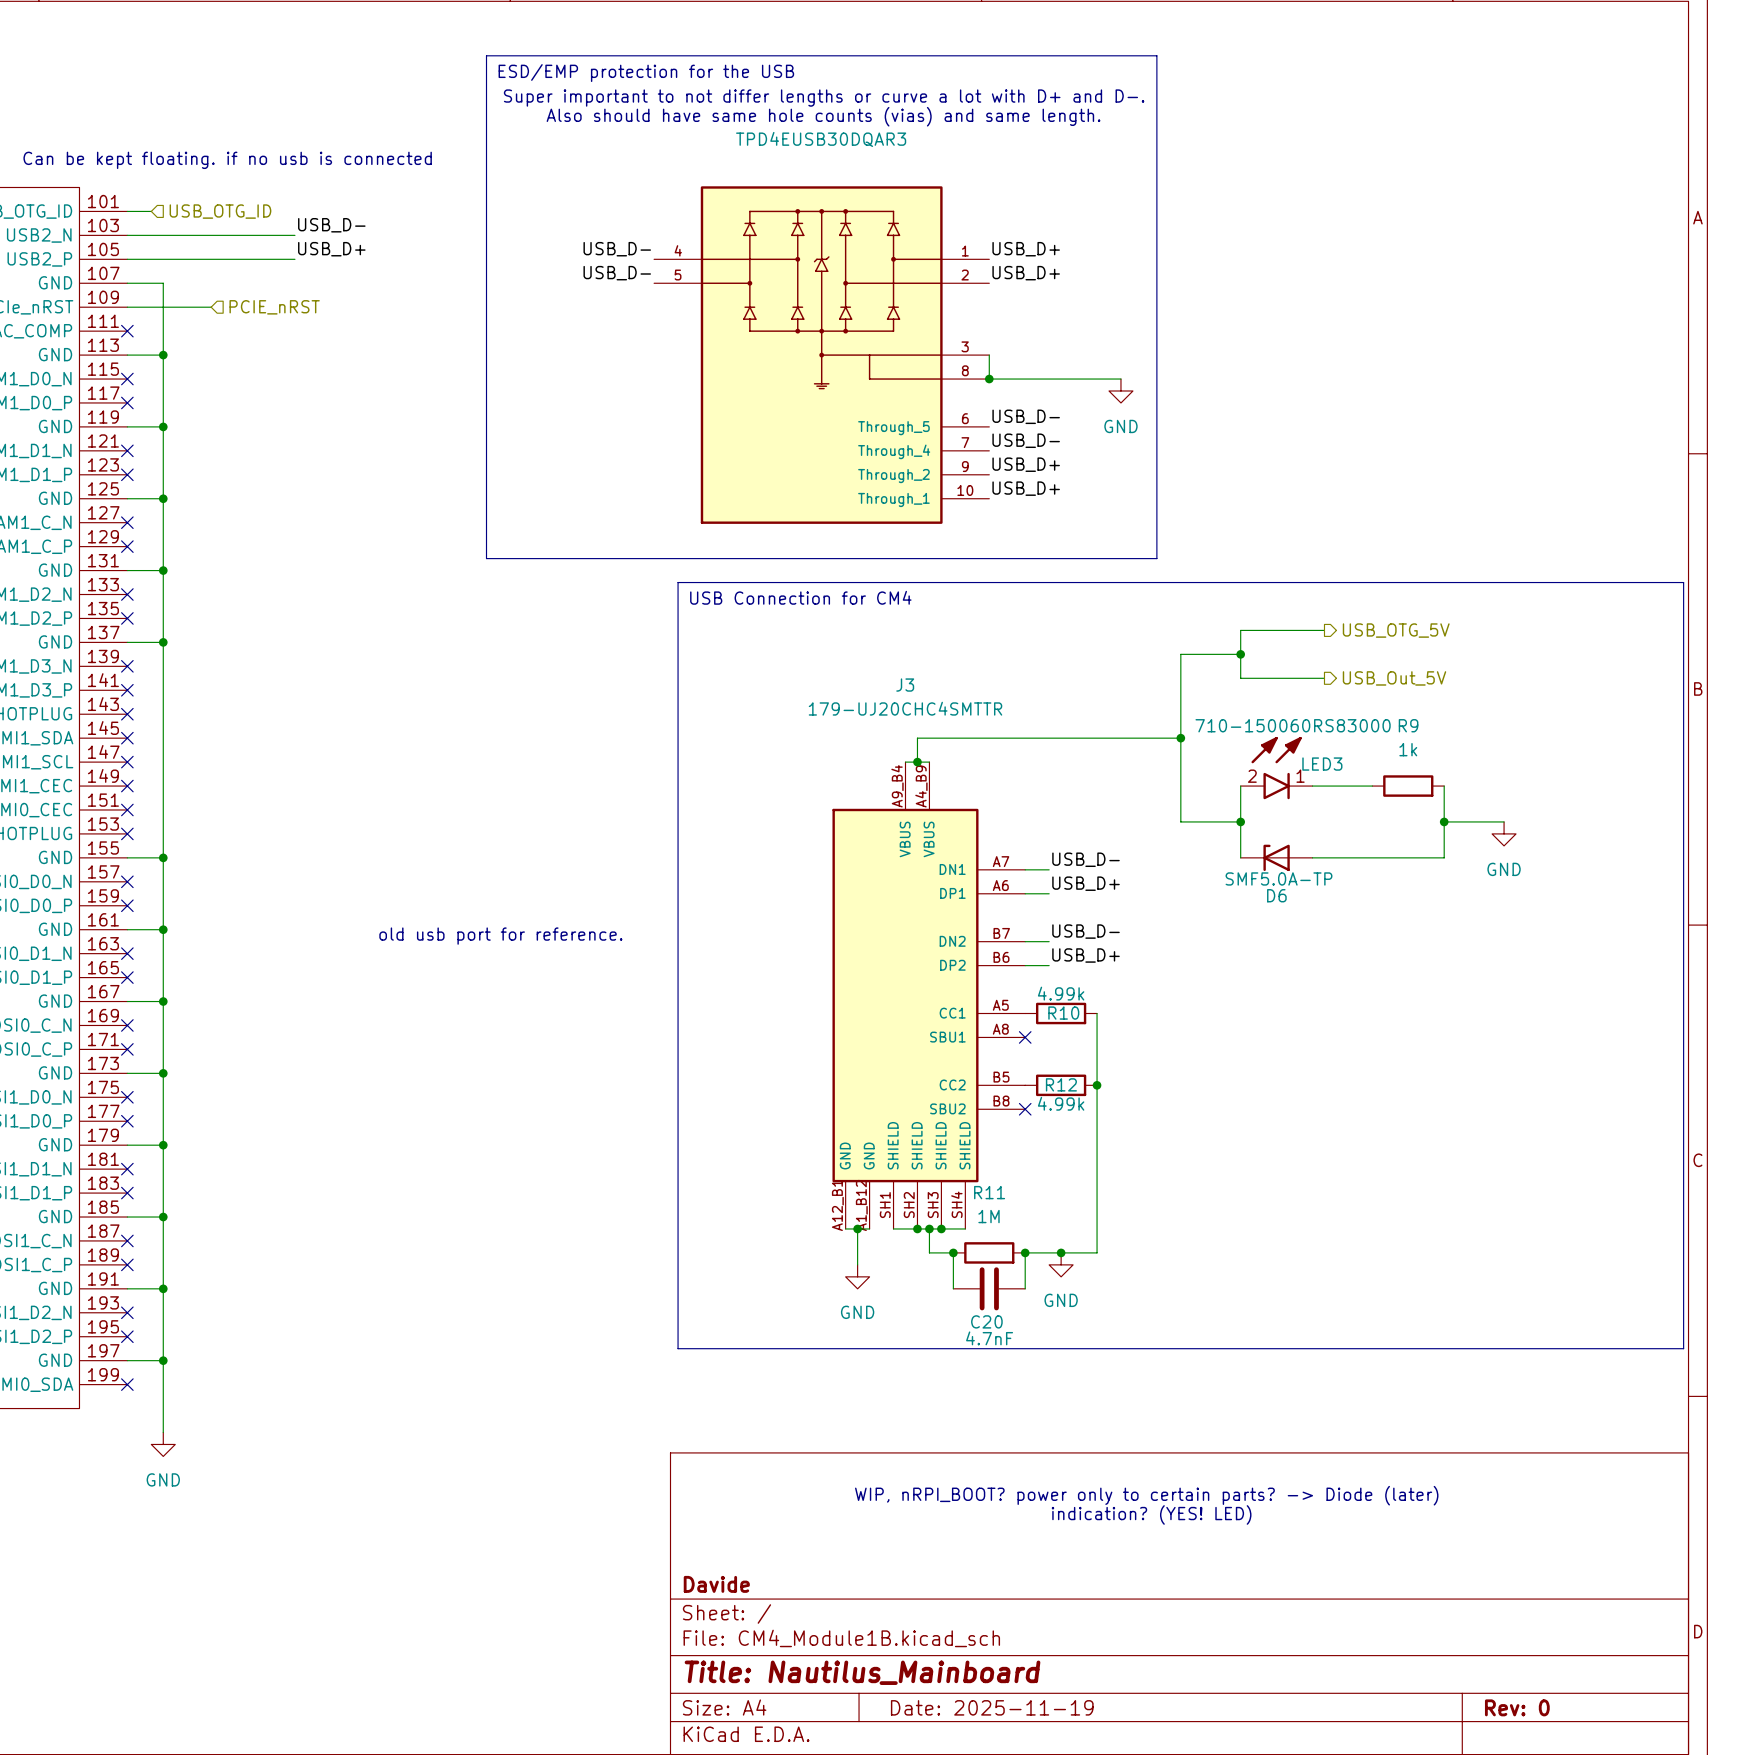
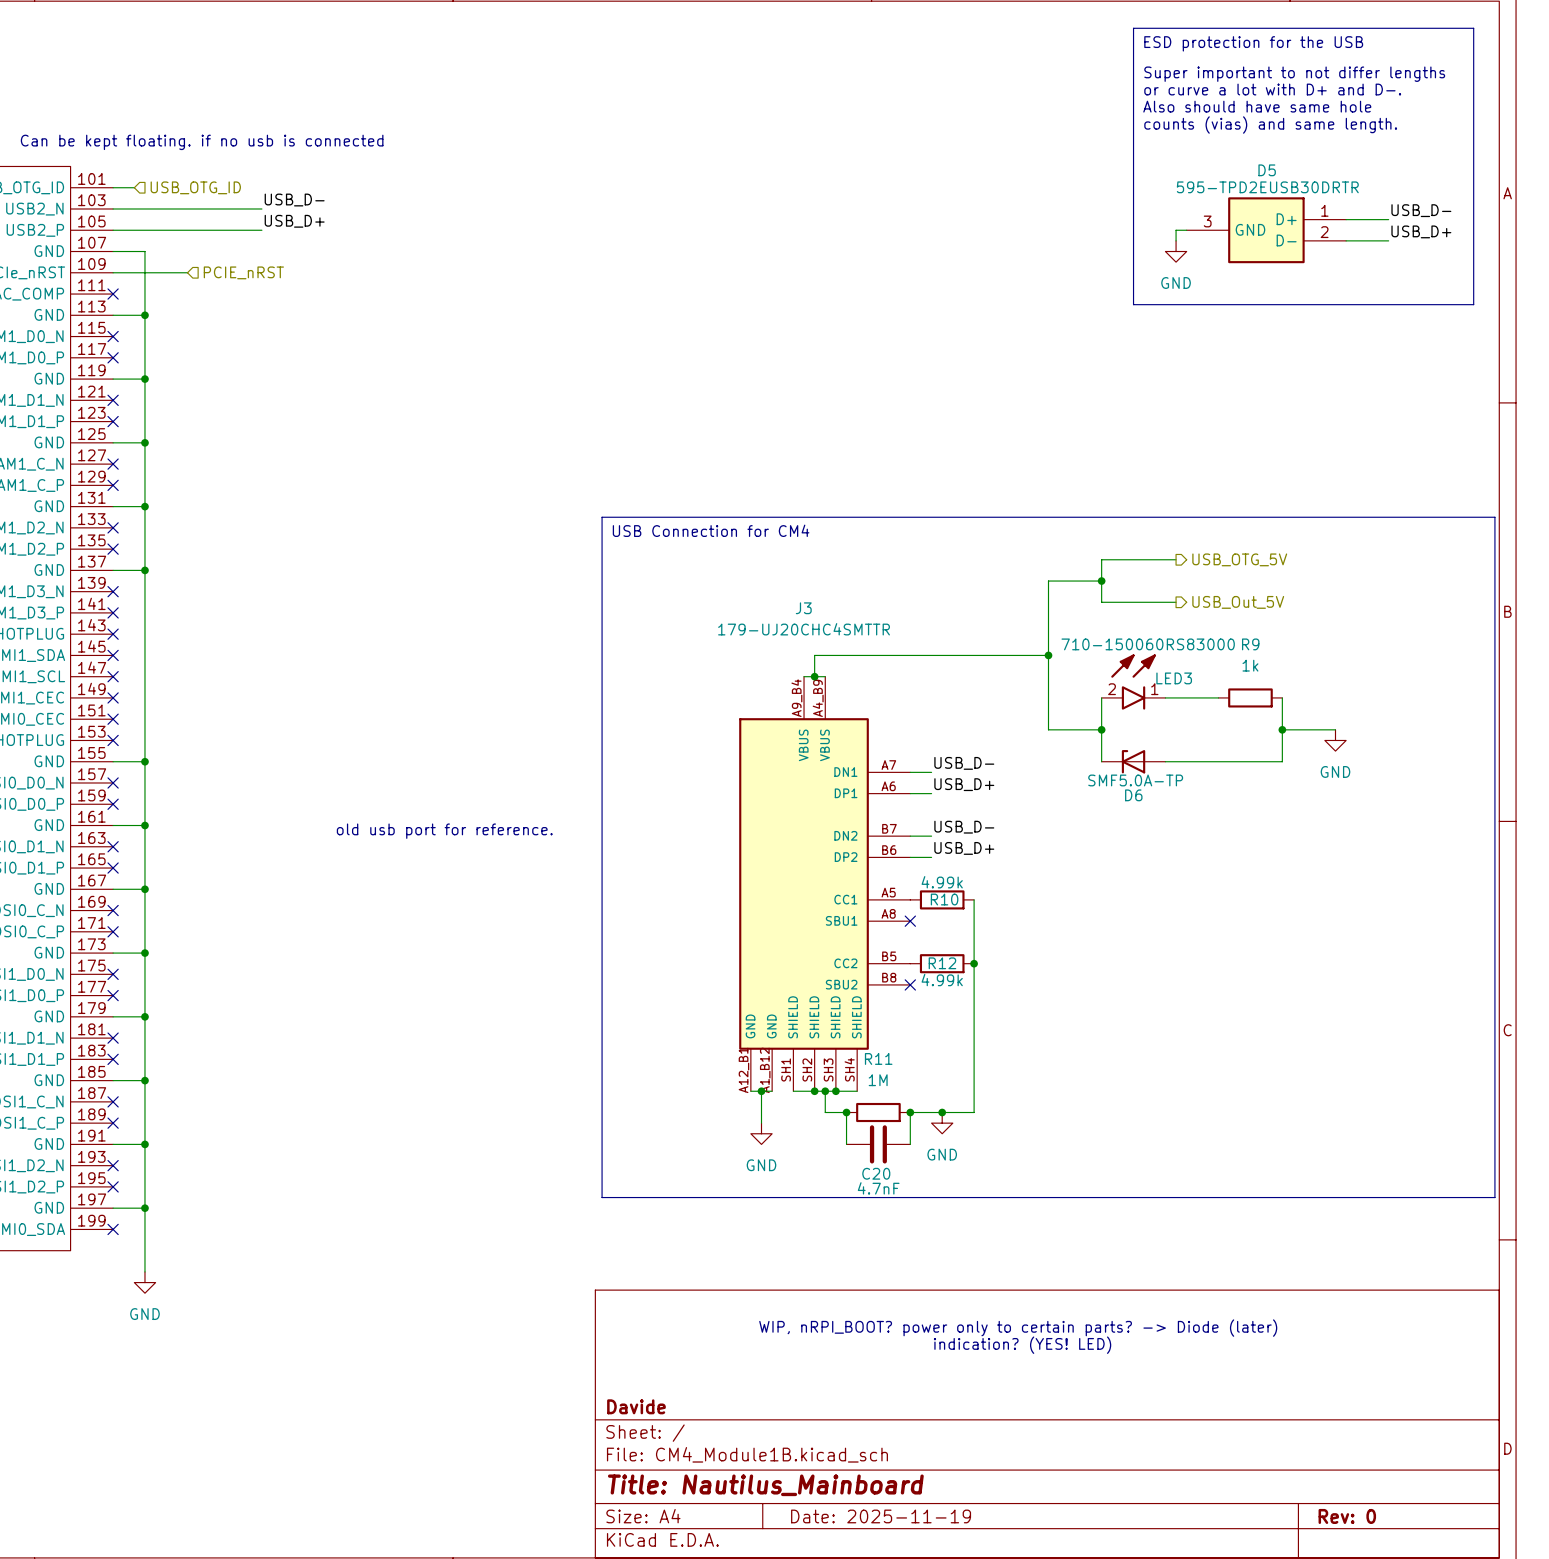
line: none -> (1133, 28) (1473, 28) (1473, 304) (1133, 304) (1133, 28)
text: none -> ESD protection for the USB (1253, 43)
line: (486, 55) (1156, 55) (1156, 558) (486, 558) (486, 55) -> none
text: ESD/EMP protection for the USB (646, 73) -> none
text: none -> Super important to not differ lengths (1294, 74)
text: Super important to not differ lengths or curve a lot with D+ and D-. (824, 98) -> none
text: none -> or curve a lot with D+ and D-. (1272, 89)
text: Also should have same hole counts (vias) and same length. (823, 116) -> none
text: none -> Also should have same hole (1257, 106)
text: none -> counts (vias) and same length. (1270, 125)
label: none -> USB_D- (1421, 210)
wire: none -> (1346, 219) (1388, 219)
label: USB_D- (617, 249) -> none
label: USB_D+ (1026, 249) -> none
wire: none -> (1186, 230) (1176, 230) (1176, 240)
D5: none -> 595-TPD2EUSB30DRTR (1266, 230)
label: none -> USB_D+ (1421, 231)
wire: none -> (1346, 240) (1388, 240)
label: USB_D- (617, 273) -> none
label: USB_D+ (1026, 273) -> none
TPD4EUSB30DQAR3: (821, 355) -> none
wire: (989, 355) (989, 379) (1120, 379) -> none
junction: (989, 379) -> none
power symbol position: GND (1120, 391) -> GND (1176, 251)
label: USB_D- (1026, 416) -> none
label: USB_D- (1026, 440) -> none
label: USB_D+ (1026, 464) -> none
label: USB_D+ (1026, 488) -> none

